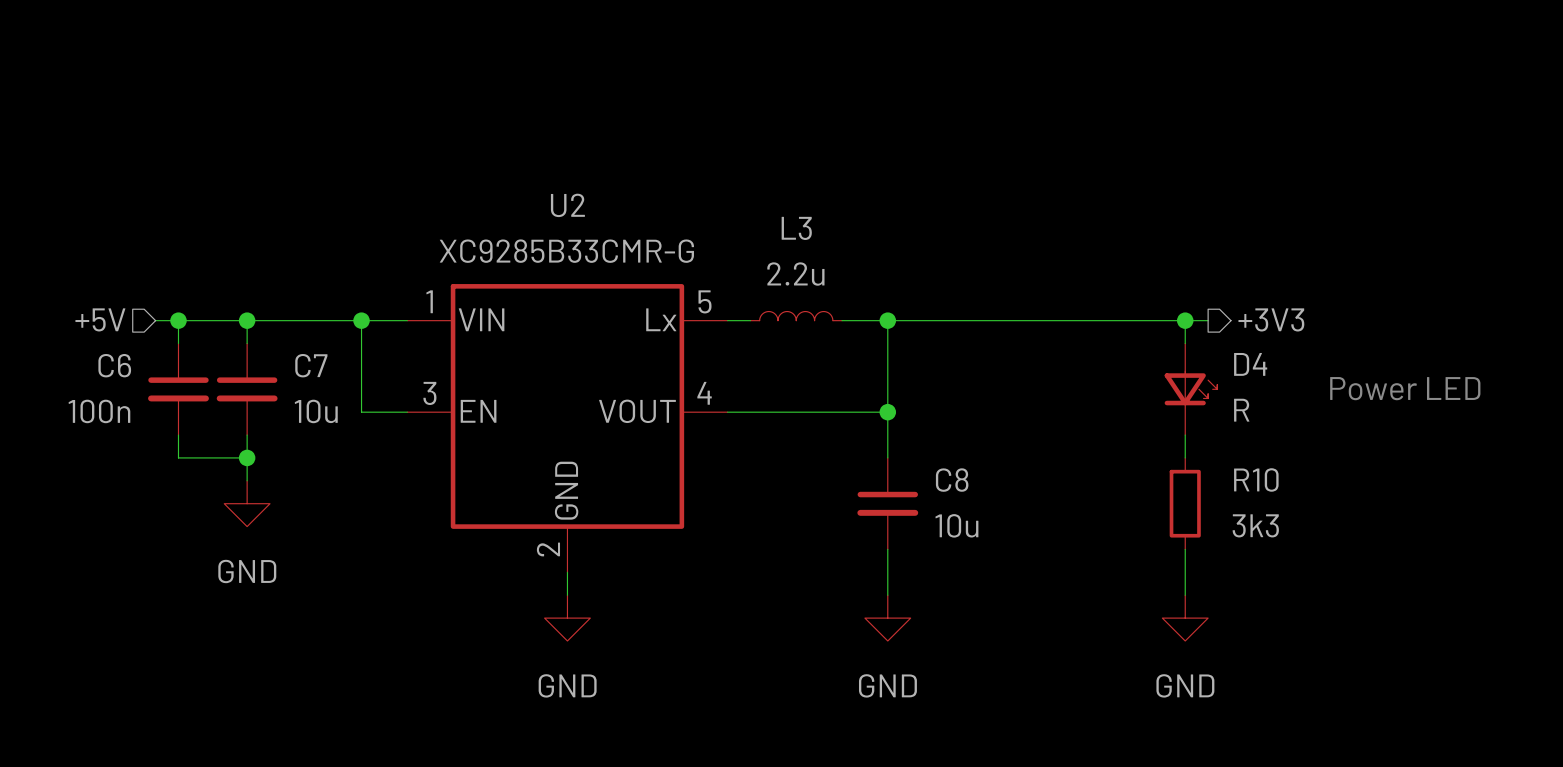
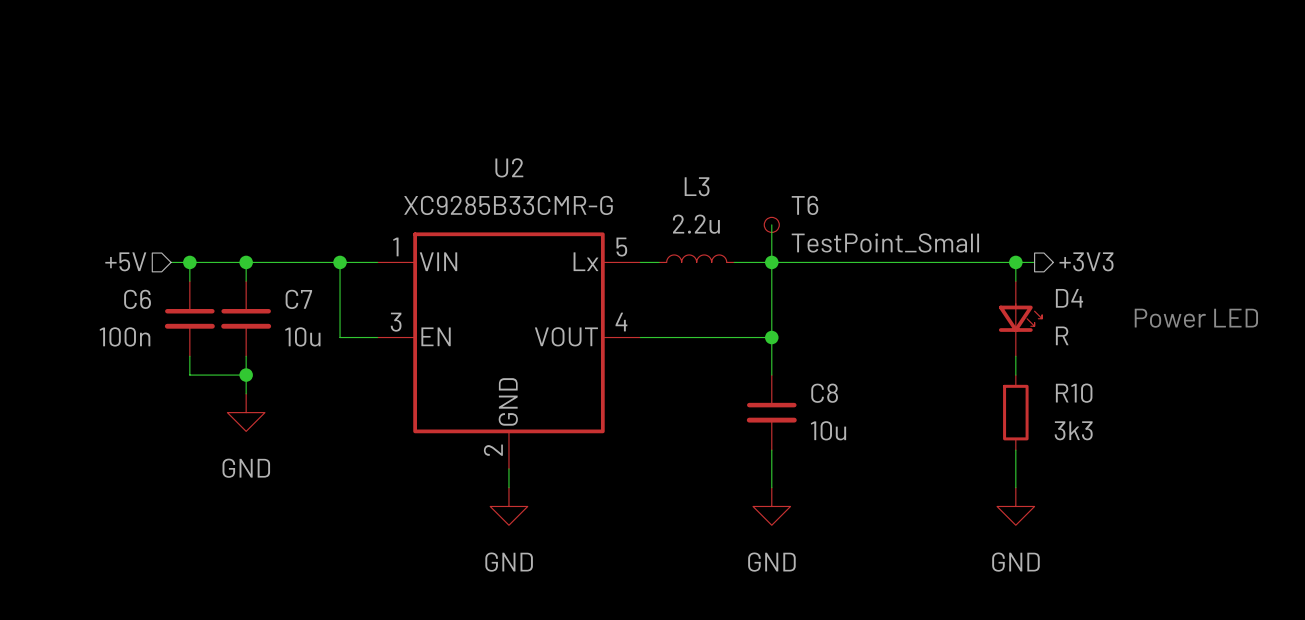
wire: none -> (771, 224) (771, 262)
T6: none -> TestPoint_Small (771, 224)

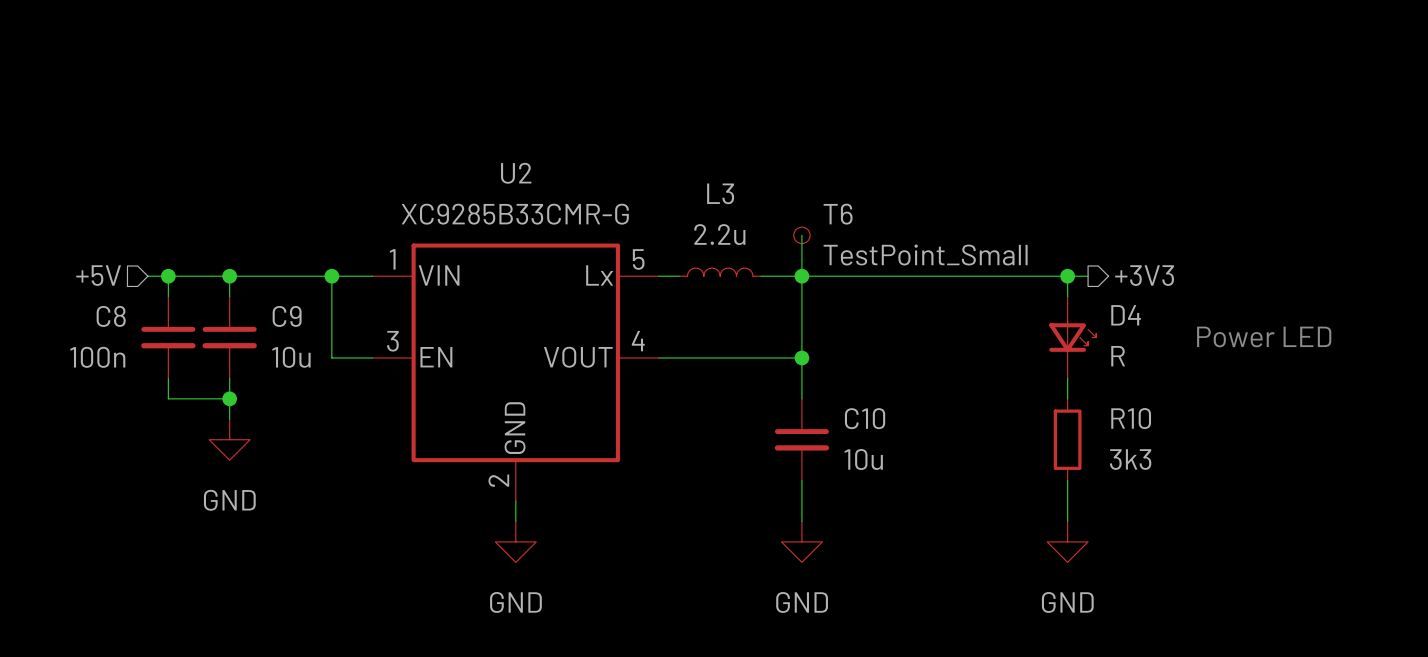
C6 name: C6 (137, 299) -> C8 (111, 316)
C7 name: C7 (298, 299) -> C9 (287, 316)
C8 name: C8 (824, 393) -> C10 (865, 418)

